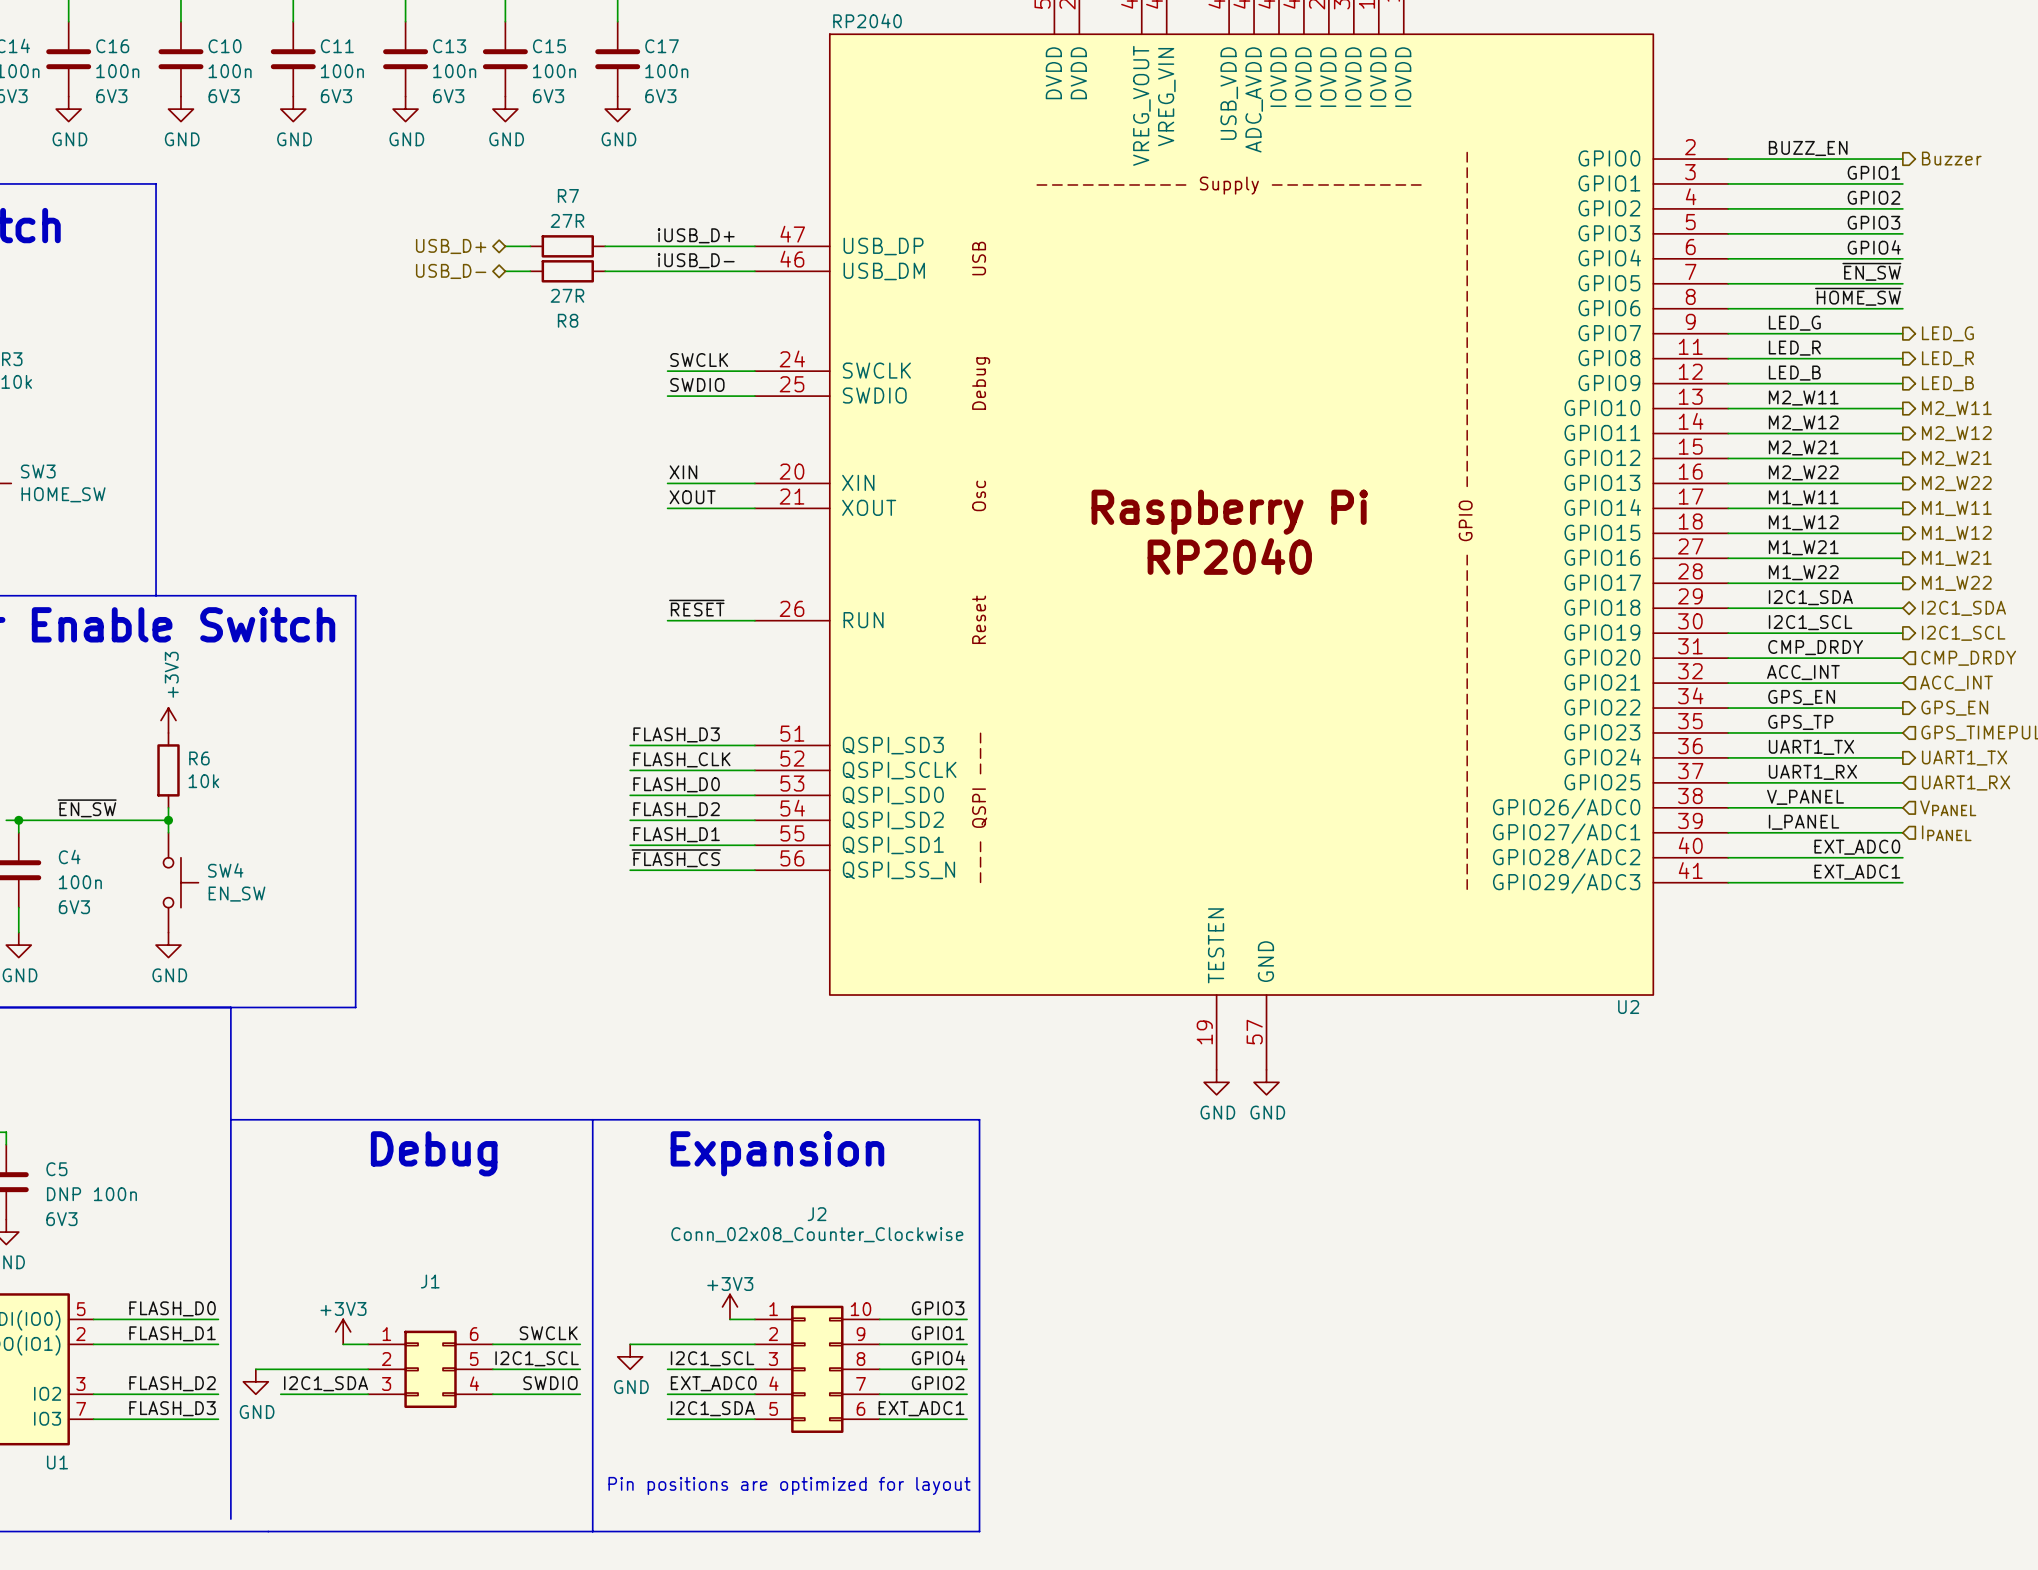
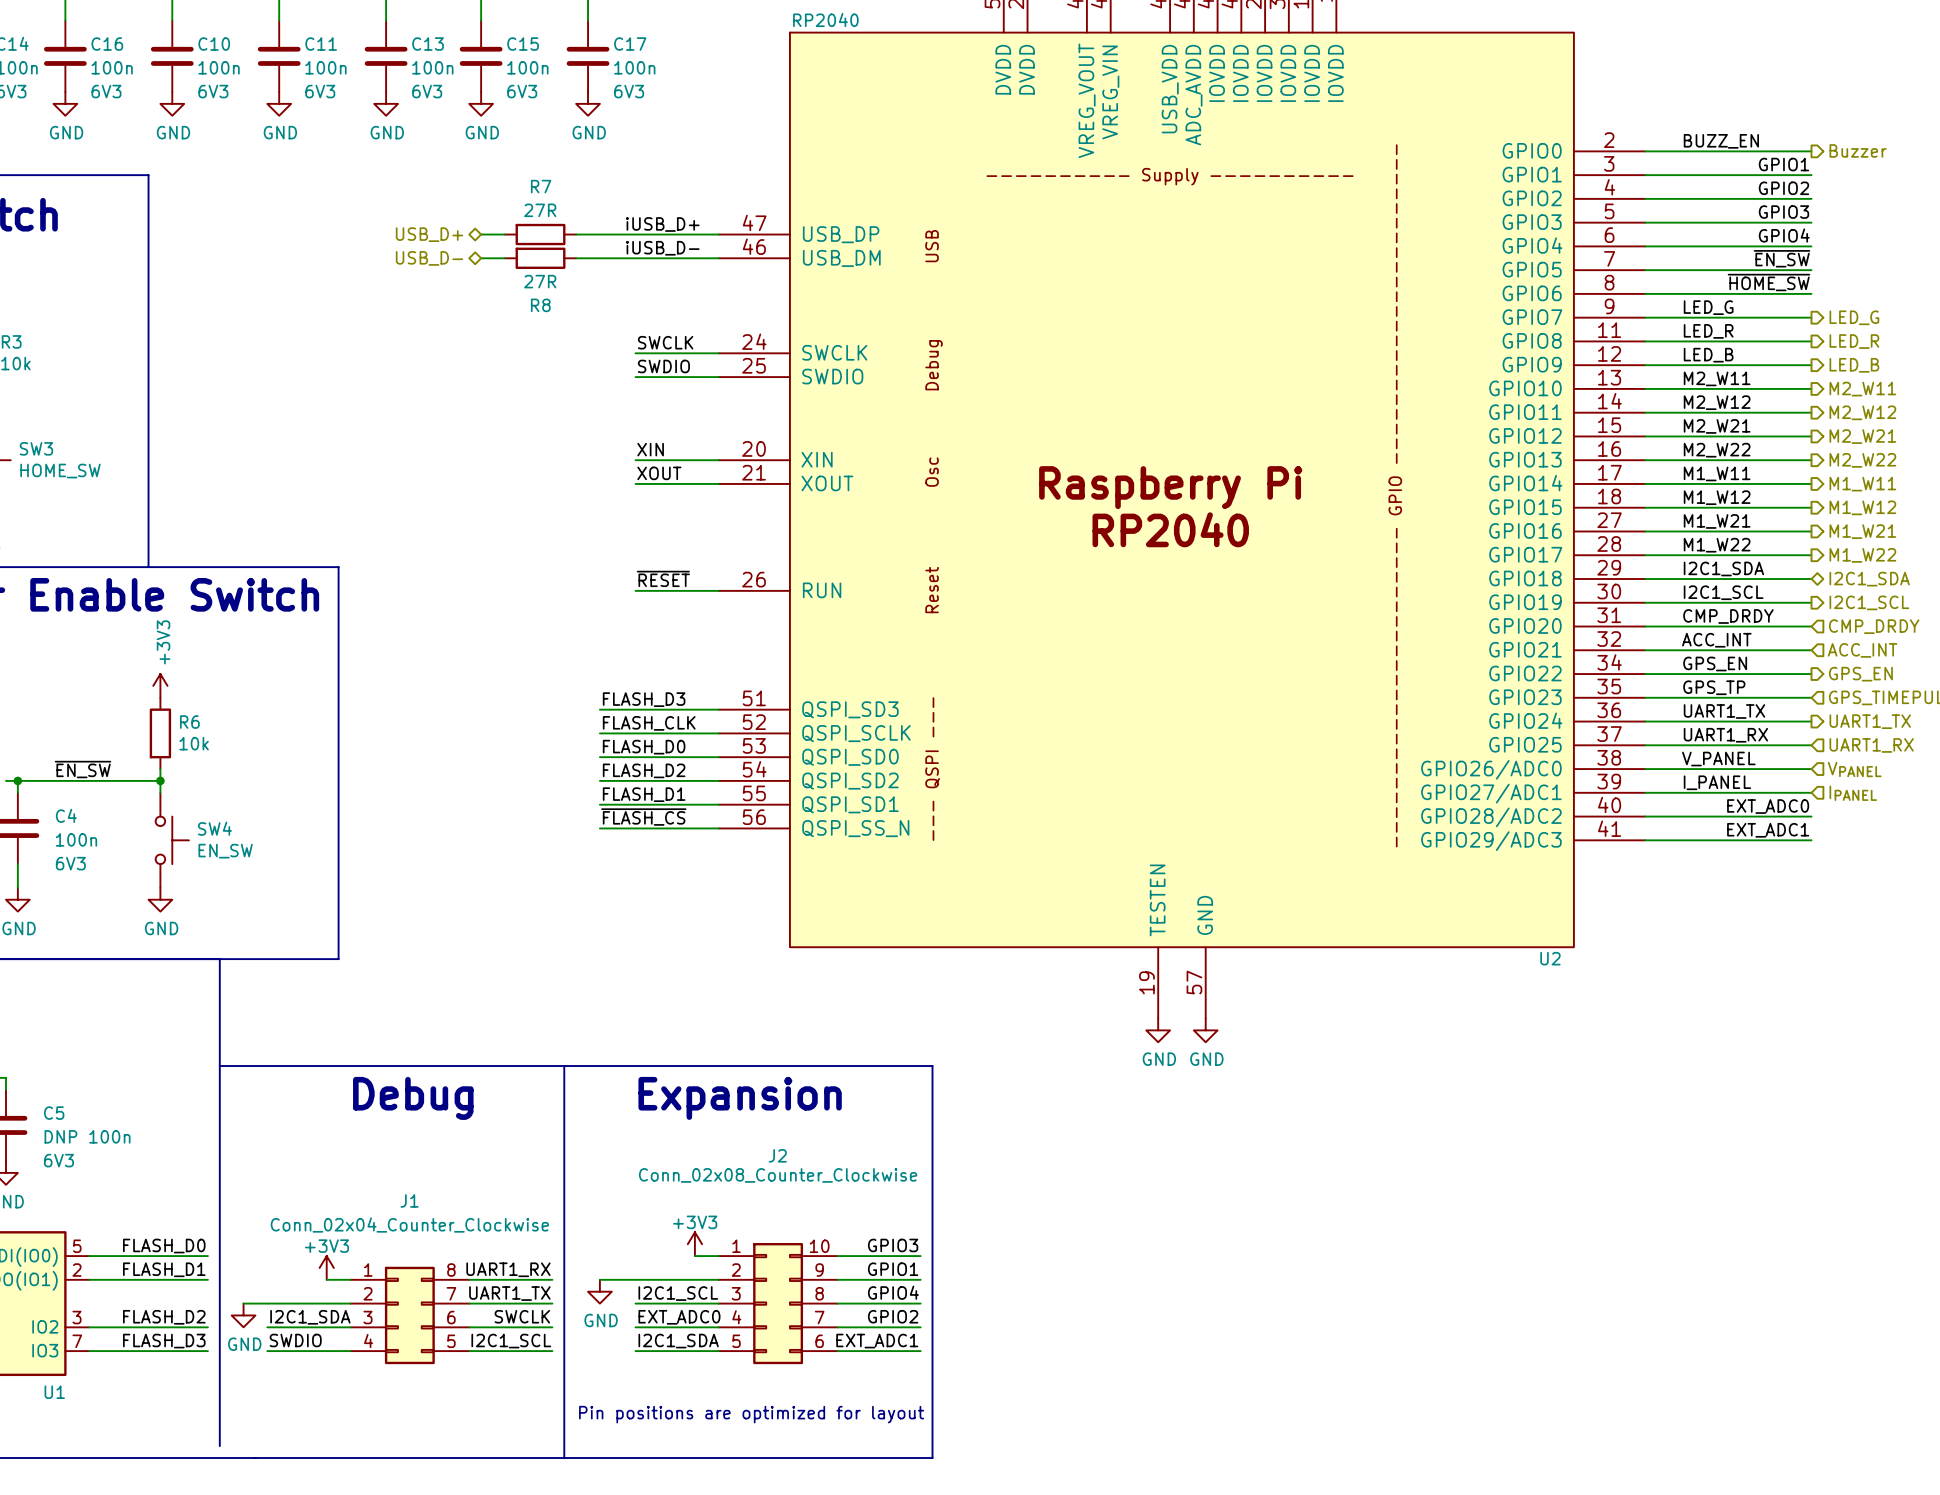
J1 name position: J1 (430, 1281) -> J1 (409, 1200)
J1 value: none -> Conn_02x04_Counter_Clockwise (409, 1225)
J1 symbol: [368, 1330, 493, 1409] -> [350, 1266, 470, 1365]
label: SWCLK (548, 1333) -> UART1_RX (508, 1269)
label: I2C1_SCL (537, 1358) -> UART1_TX (509, 1293)
label: SWDIO (550, 1383) -> SWCLK (522, 1316)
label: none -> SWDIO (295, 1340)
label: none -> I2C1_SCL (511, 1341)
wire: none -> (267, 1351) (350, 1351)
wire: none -> (469, 1351) (552, 1351)

